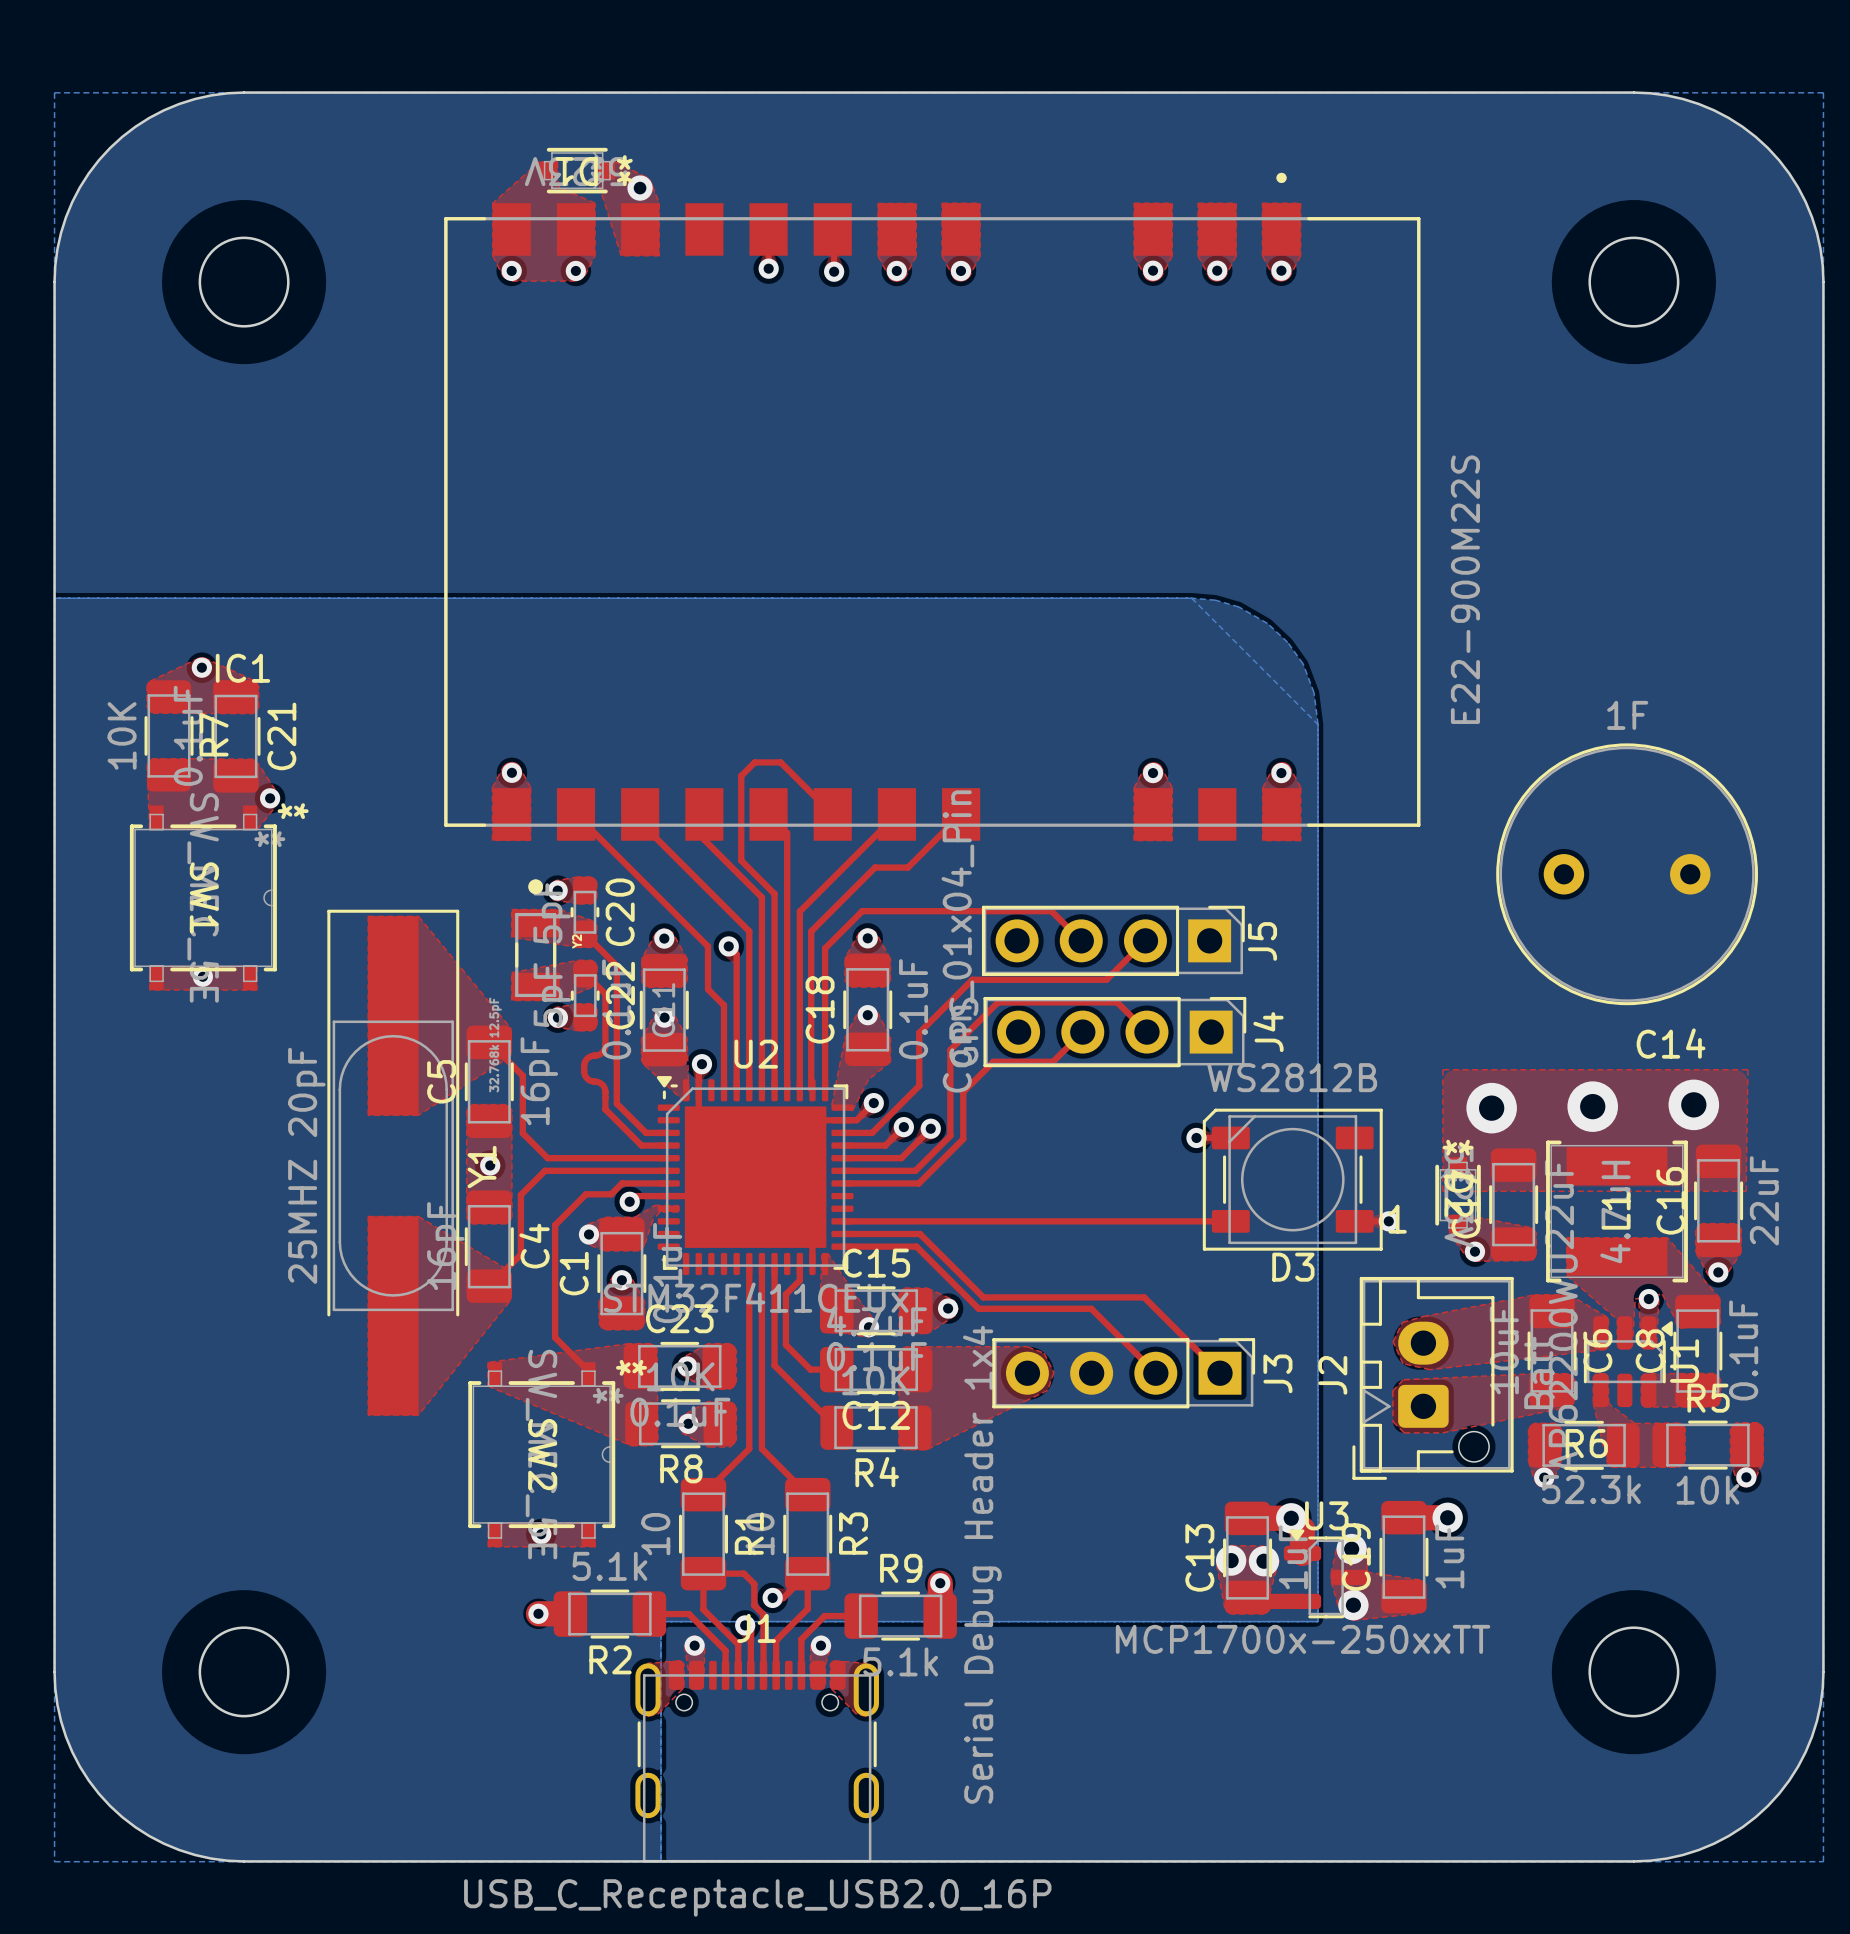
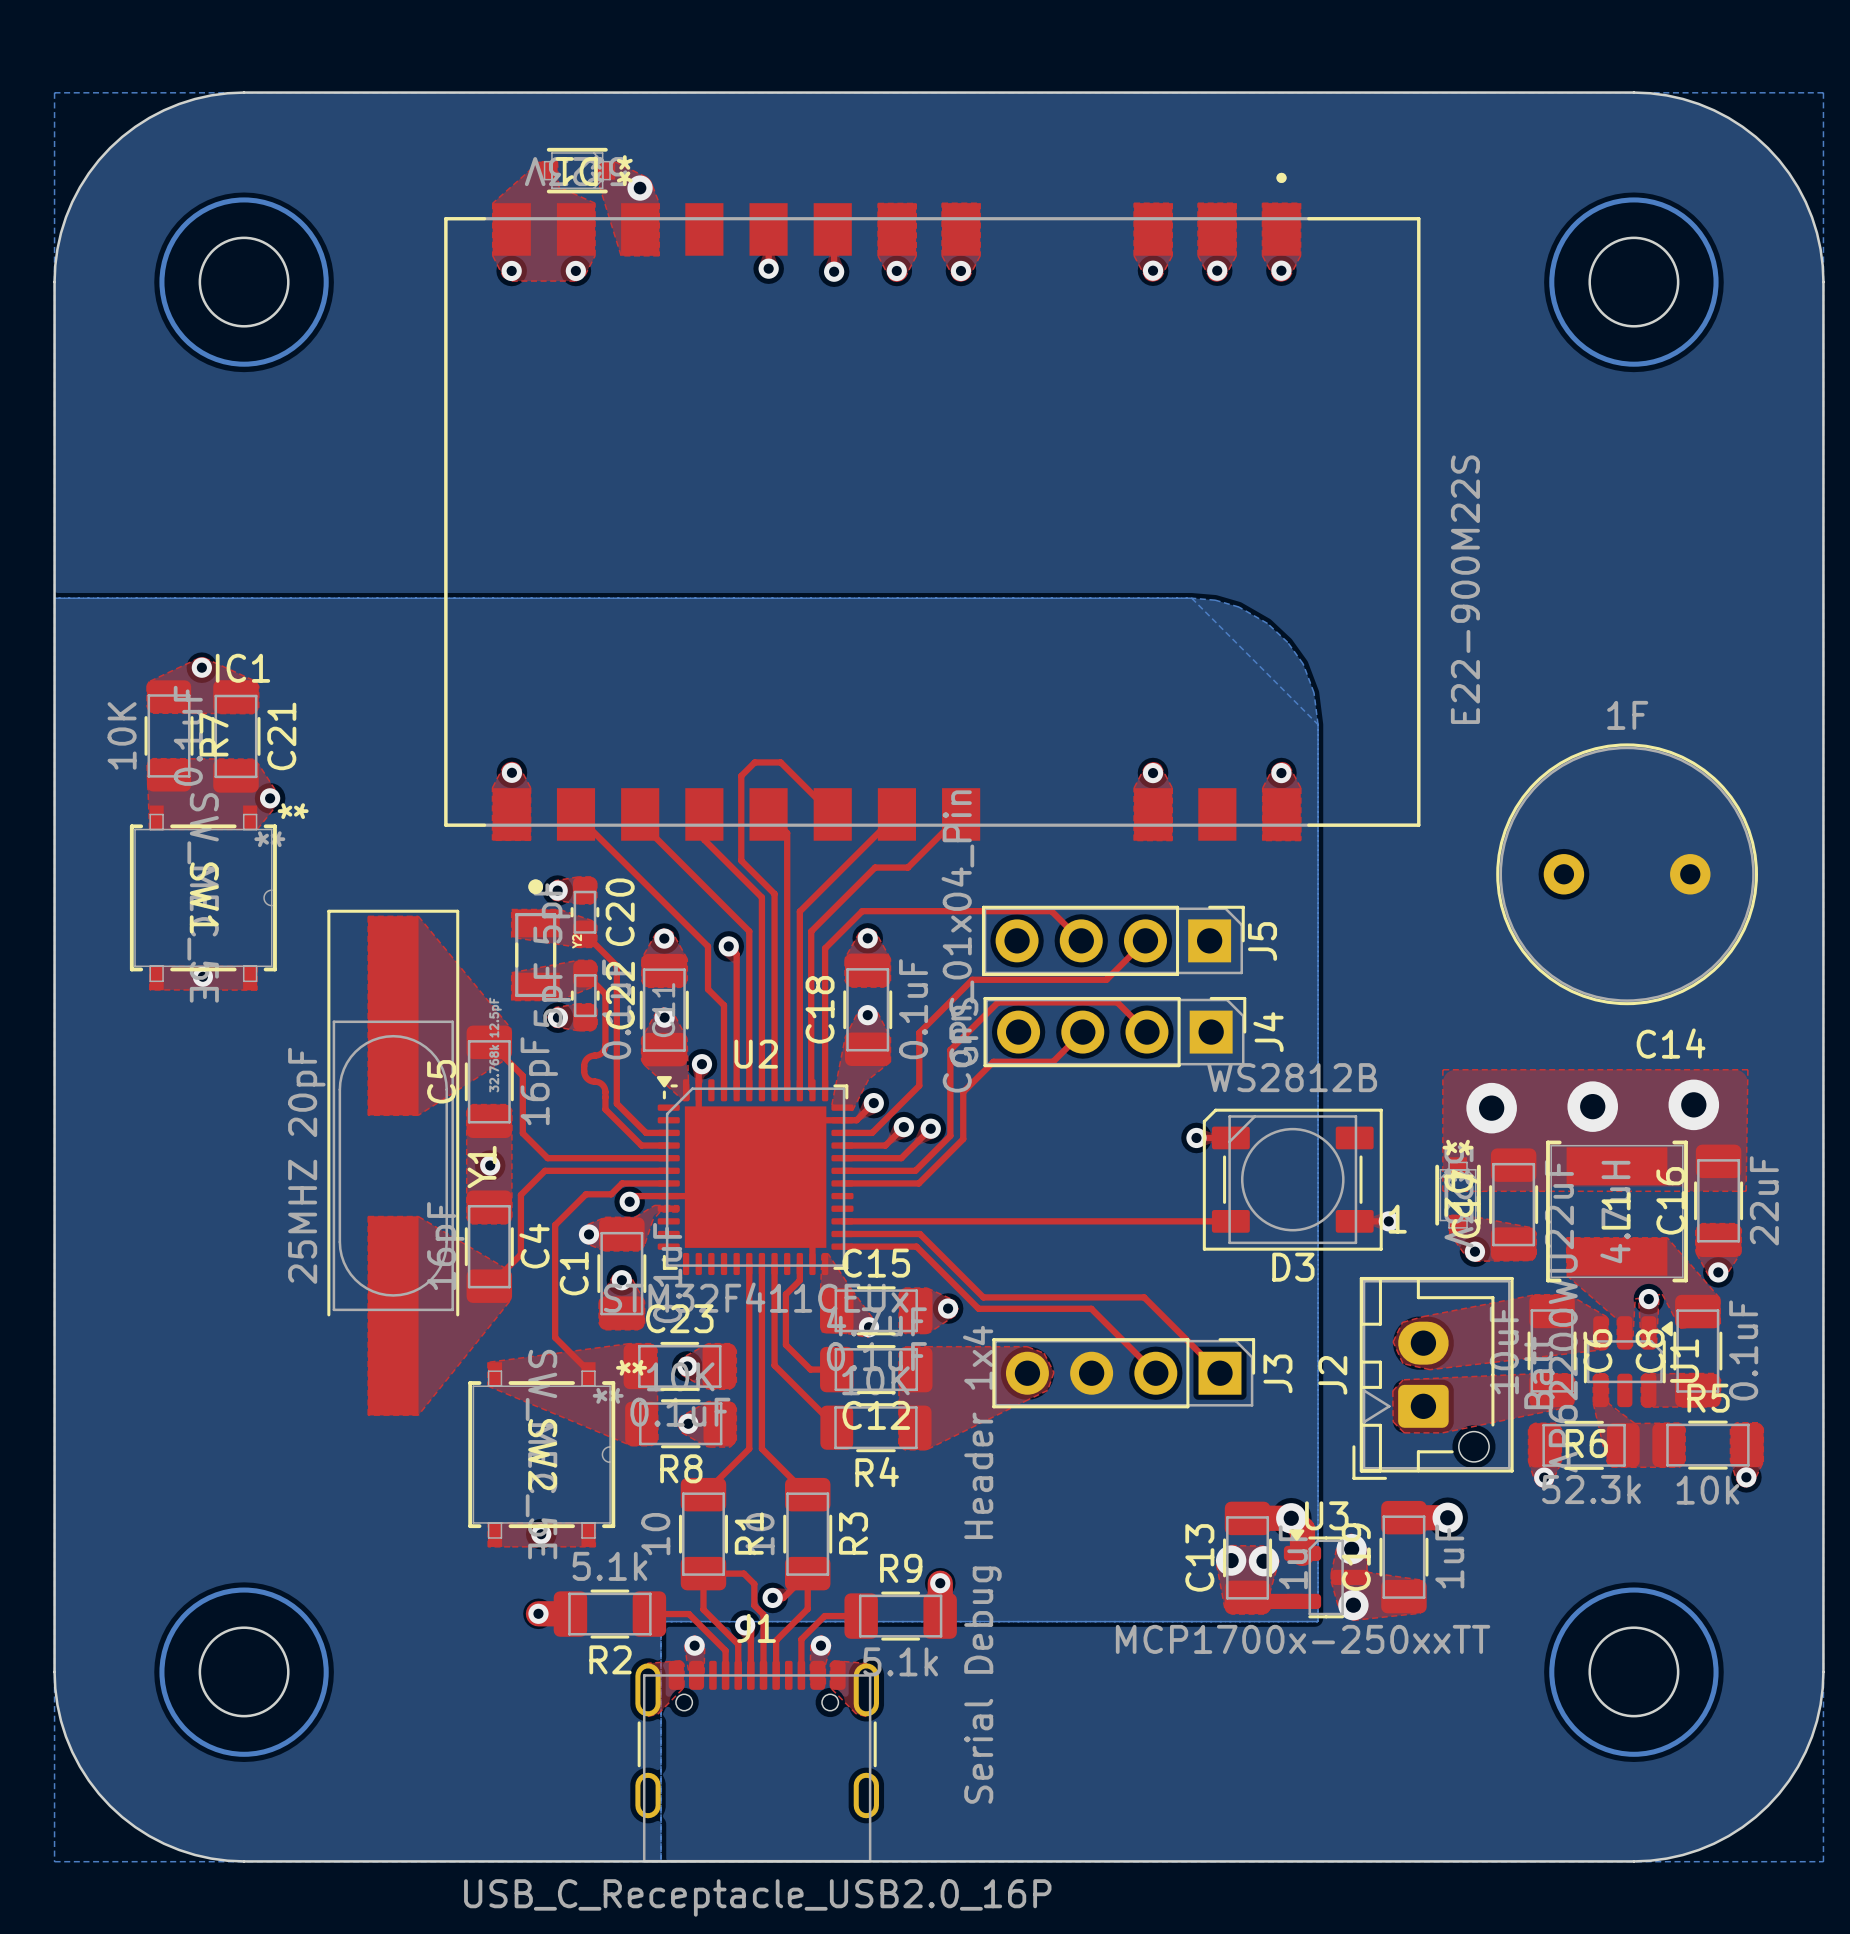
drawing: none -> [159, 197, 329, 367]
drawing: none -> [1549, 197, 1719, 367]
drawing: none -> [159, 1587, 329, 1757]
drawing: none -> [1549, 1587, 1719, 1757]

